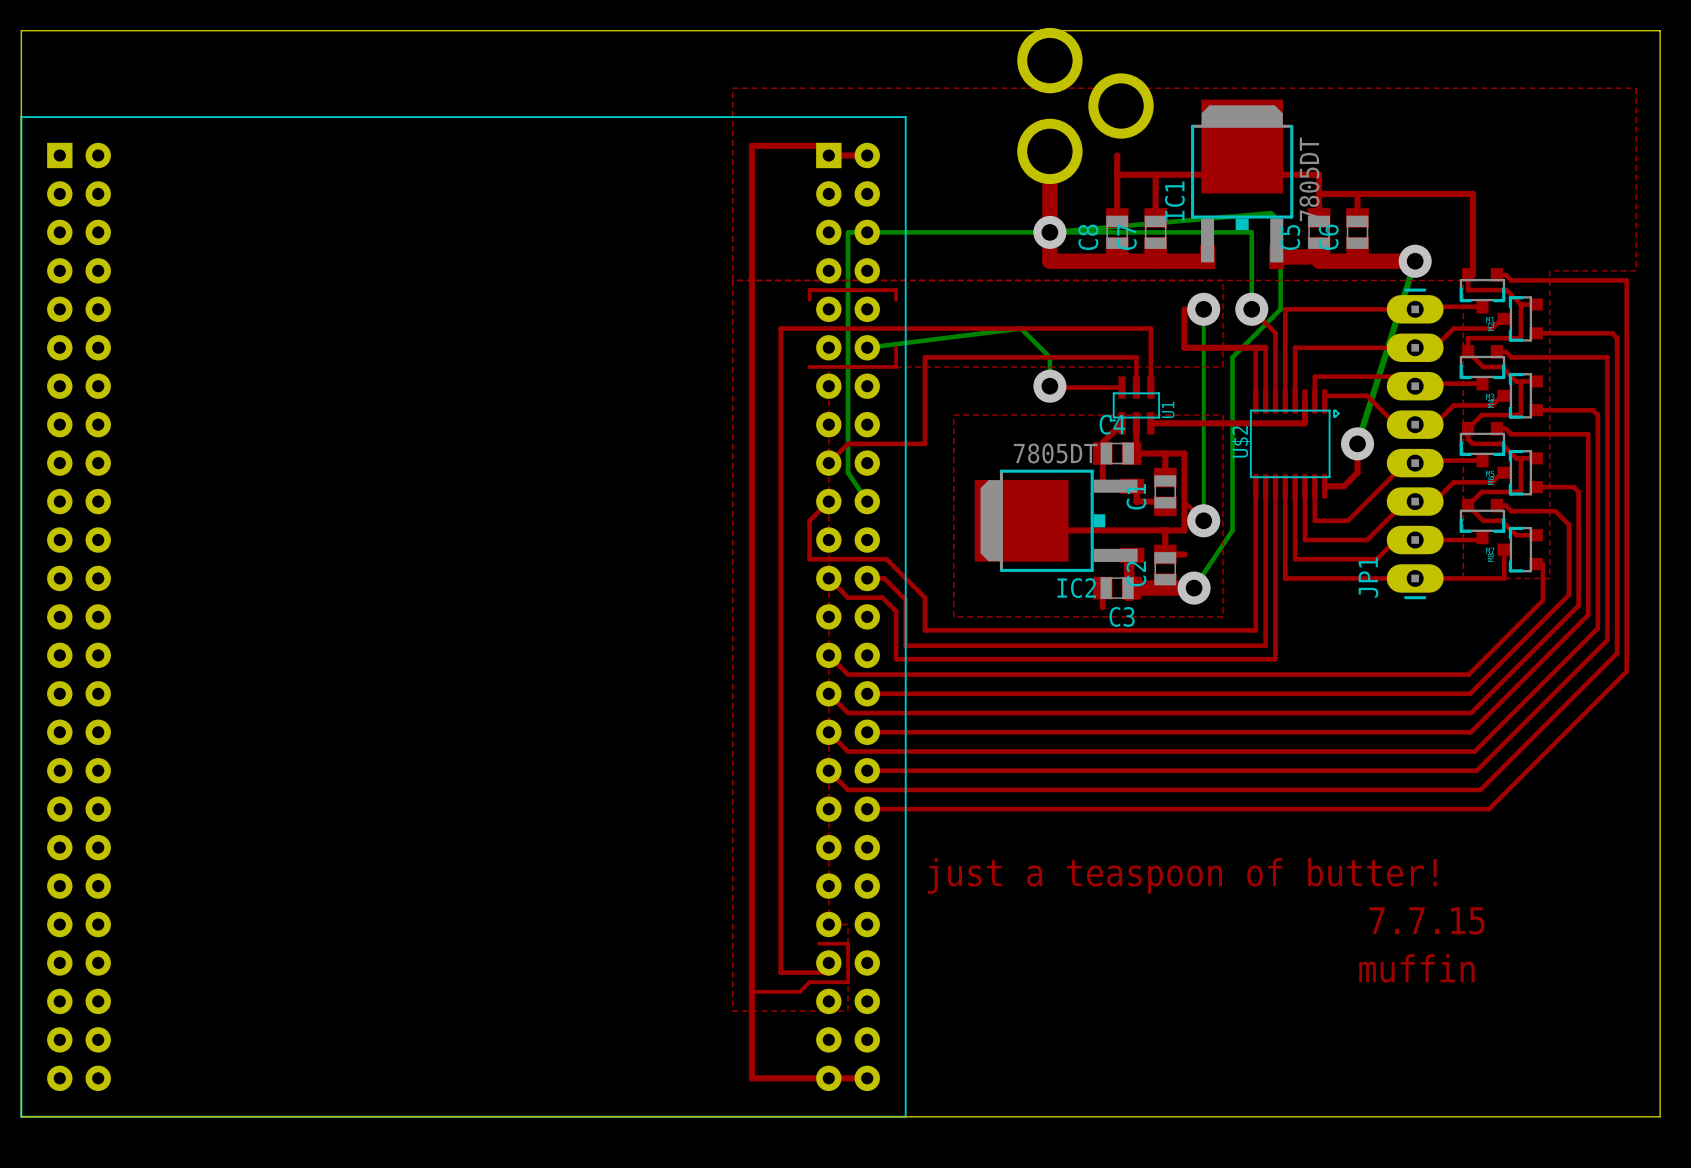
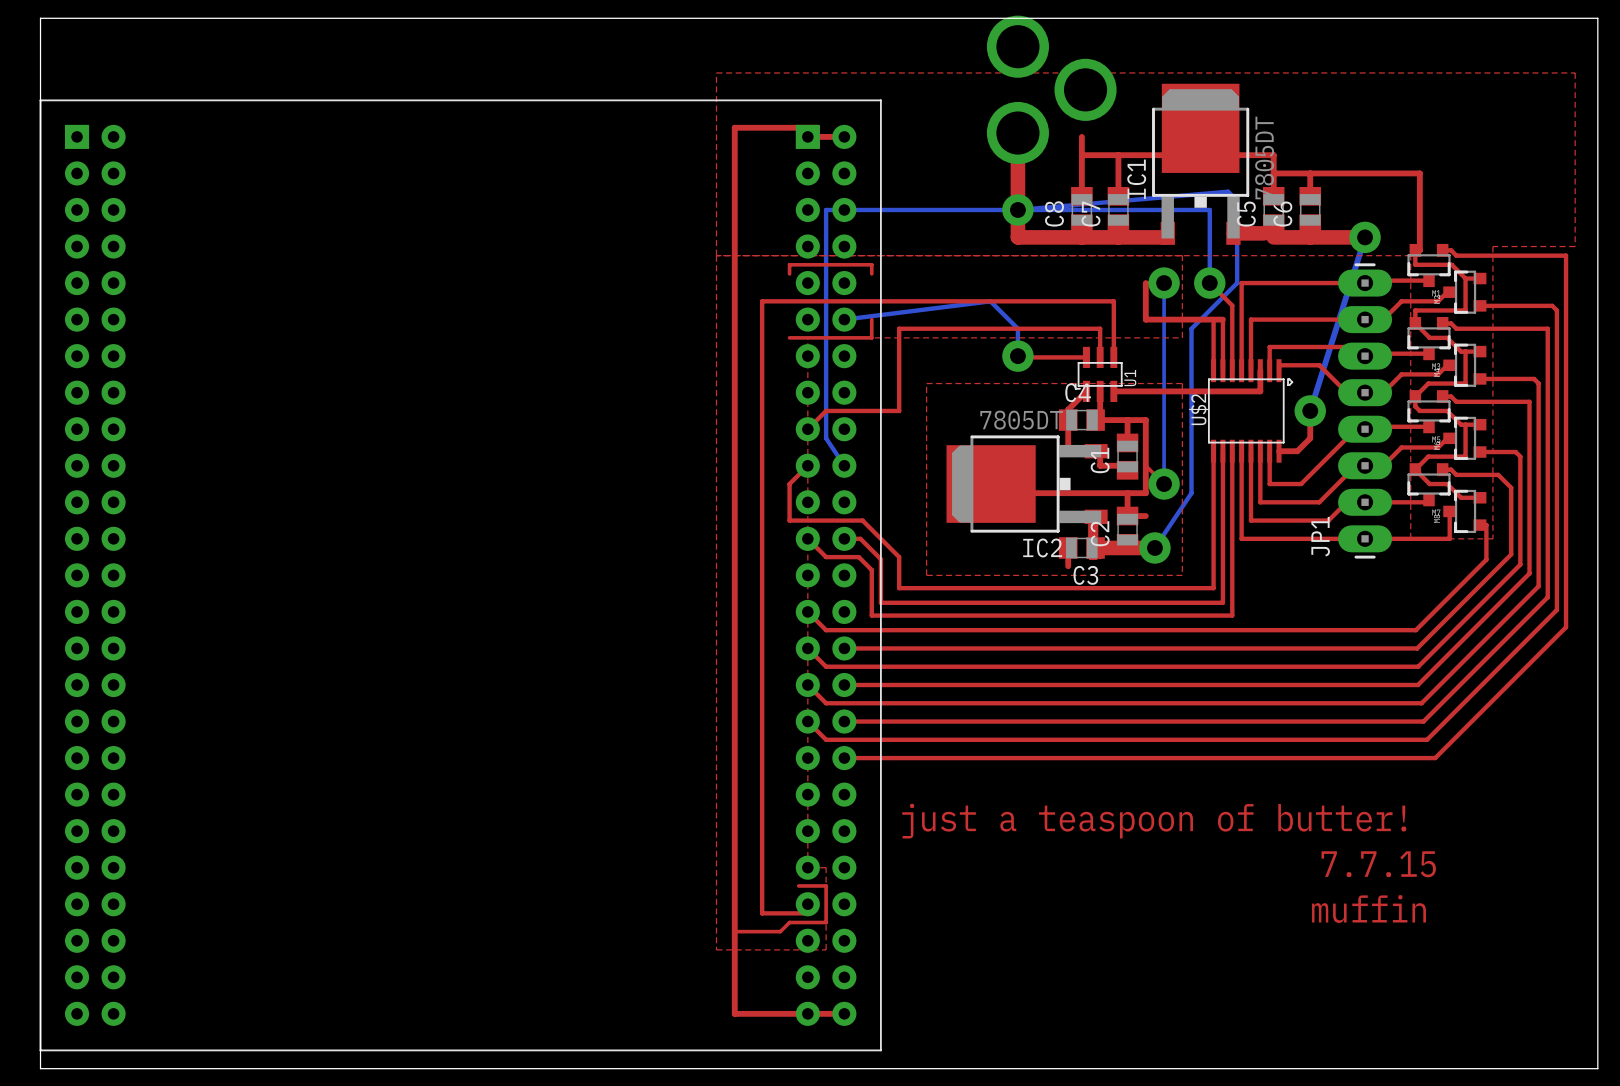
board edge: (21, 1116) (1660, 1116) -> (40, 1050) (40, 1068) (1597, 1068) (1597, 1050)

